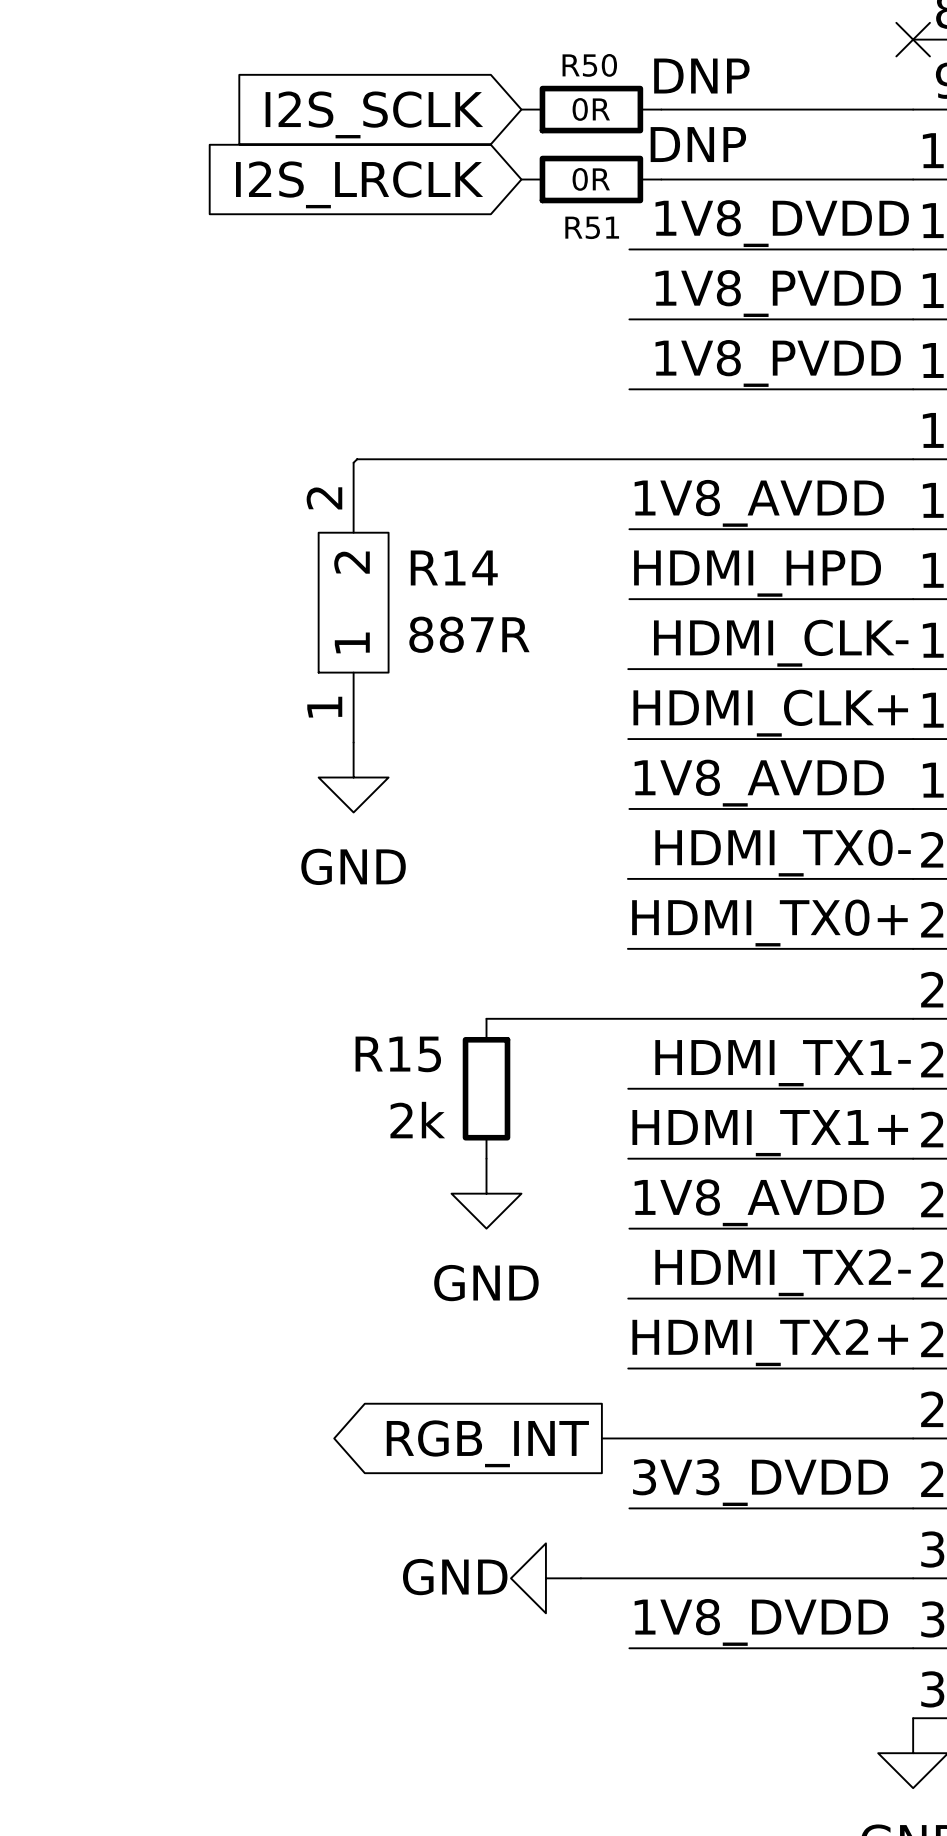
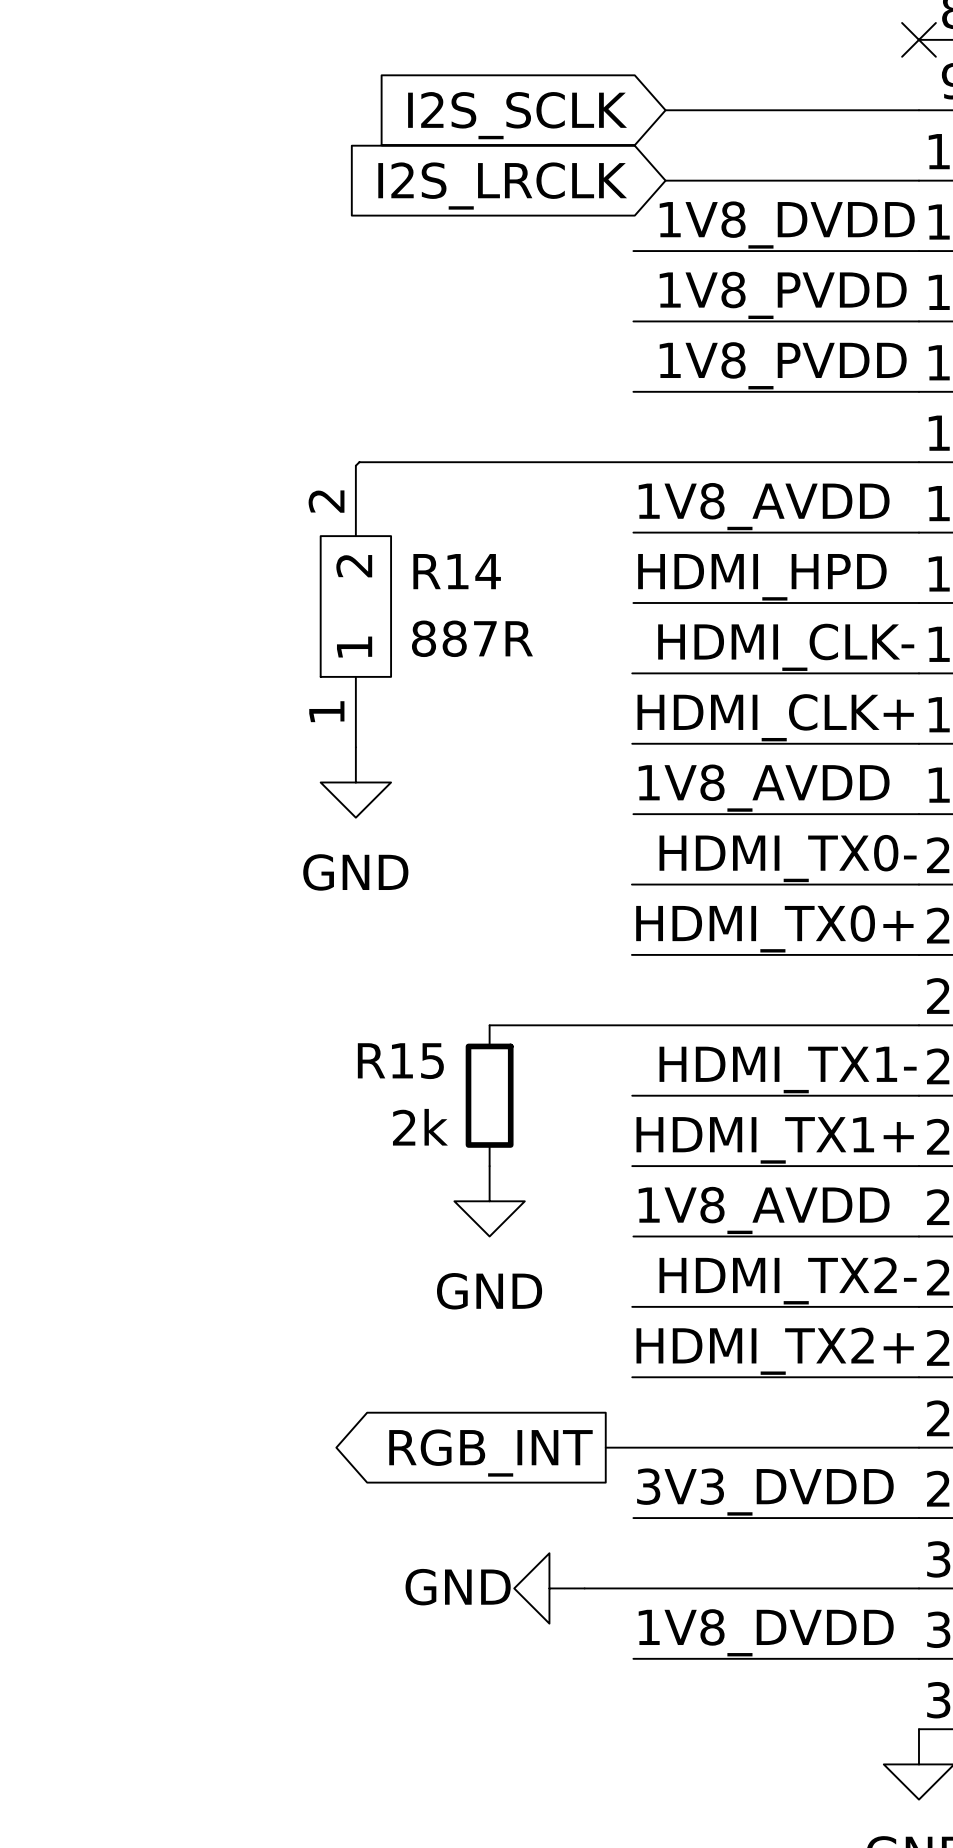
text: DNP (701, 76) -> none
R50: 0R (591, 109) -> none
global label position: I2S_SCLK (374, 114) -> I2S_SCLK (517, 115)
text: DNP (698, 144) -> none
R51: 0R (591, 179) -> none
global label position: I2S_LRCLK (359, 184) -> I2S_LRCLK (502, 186)

